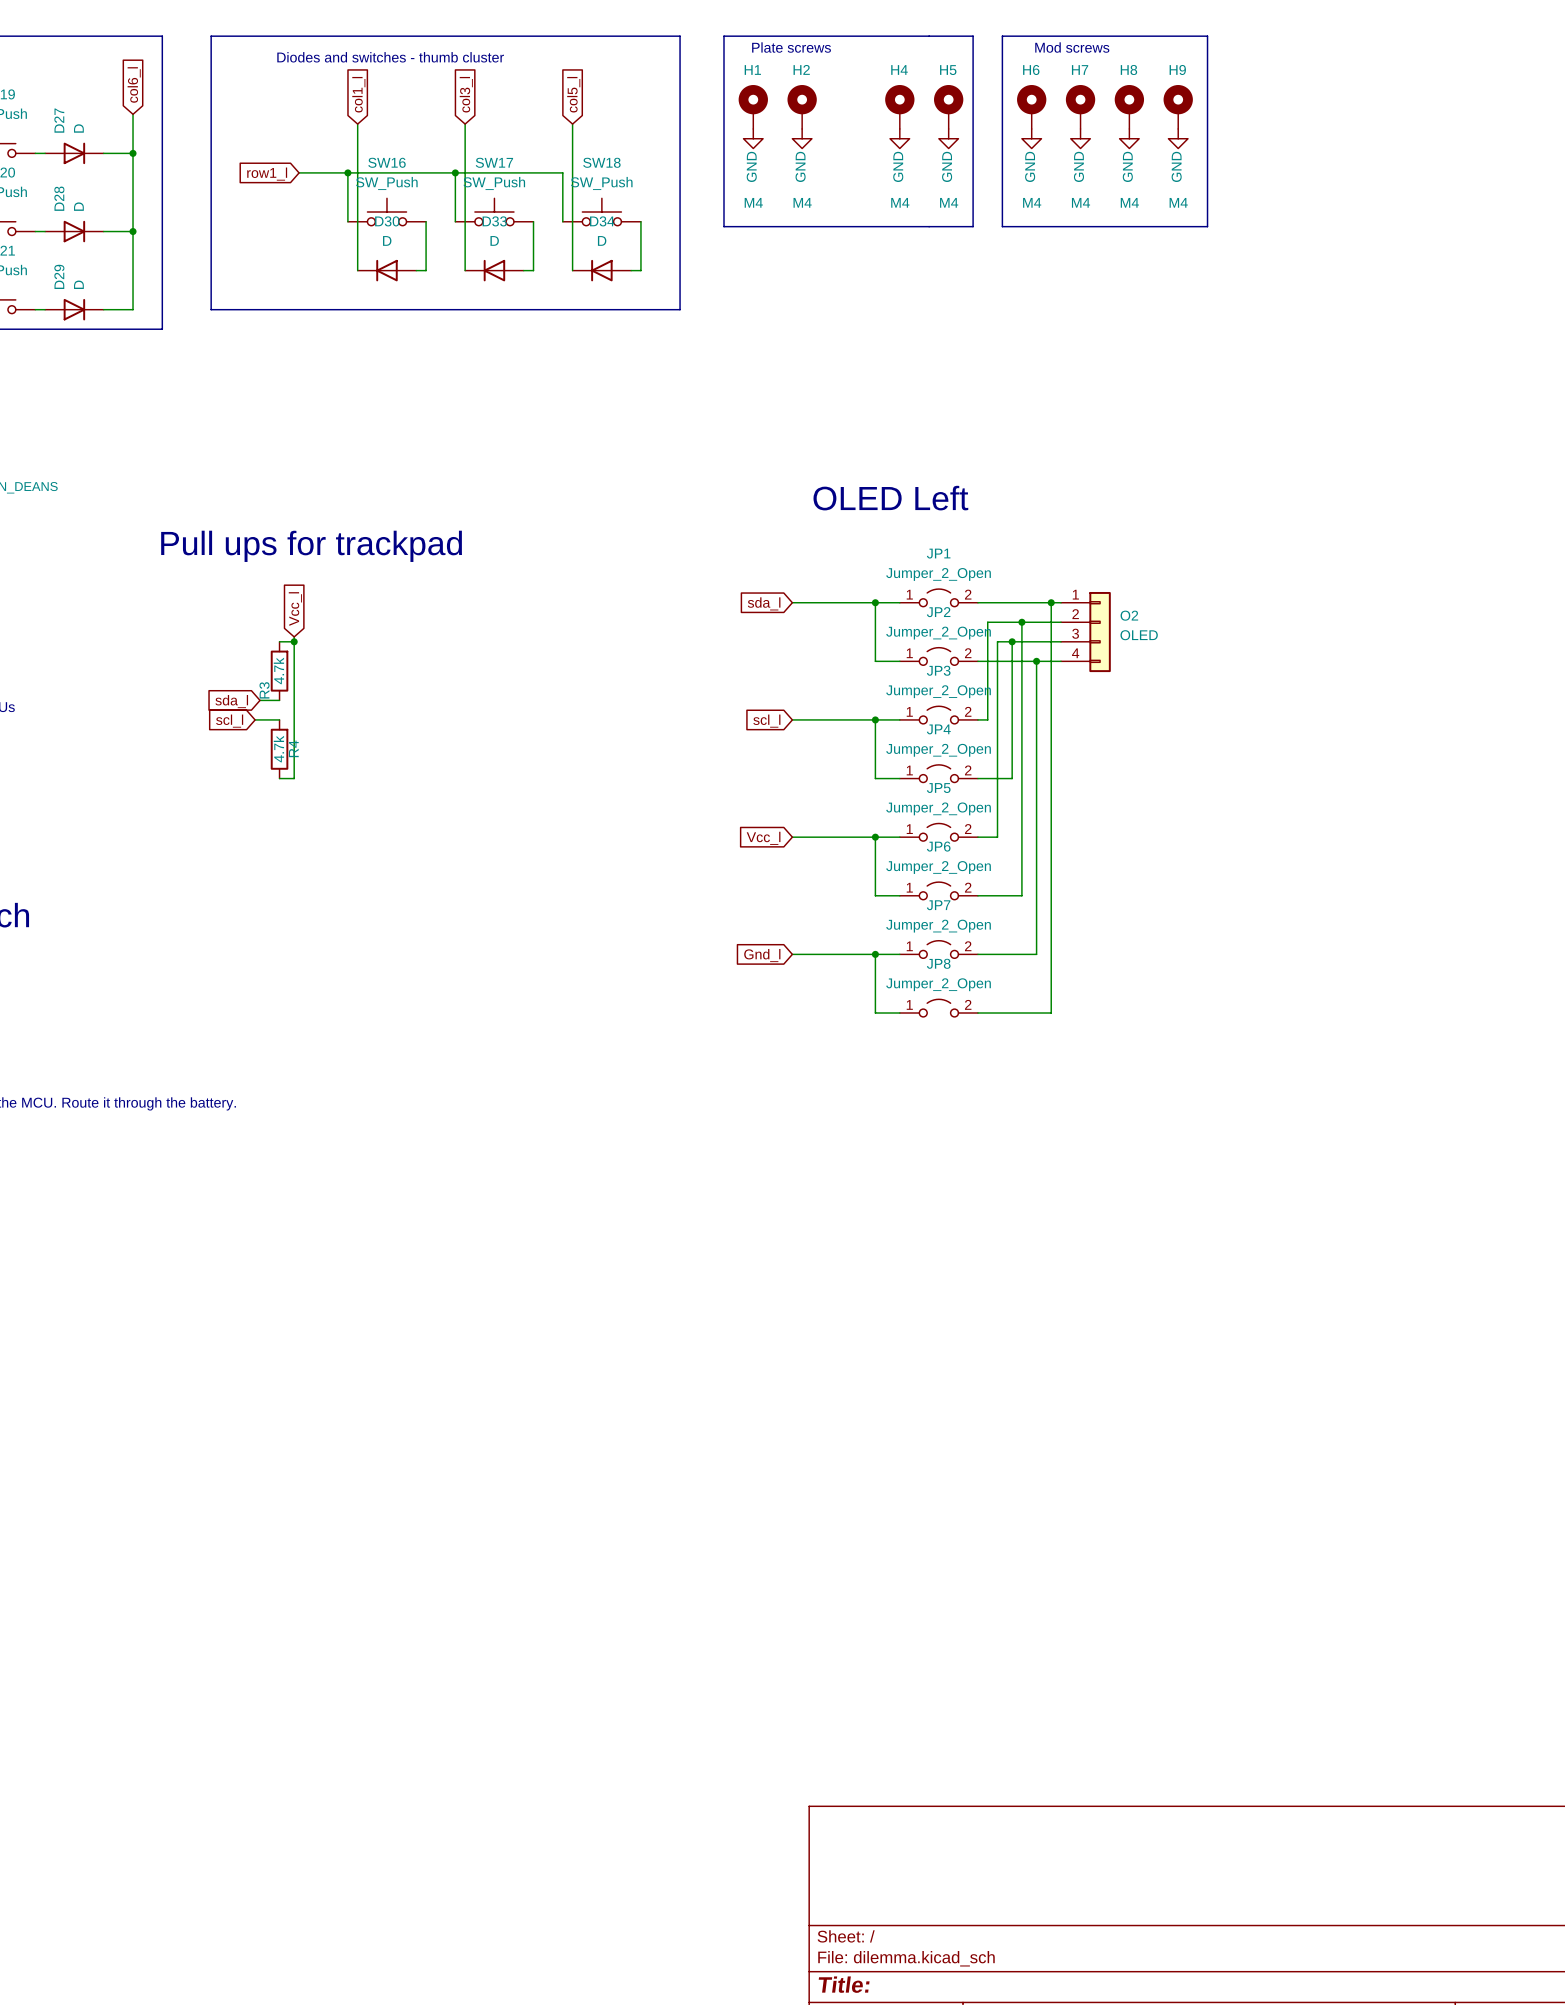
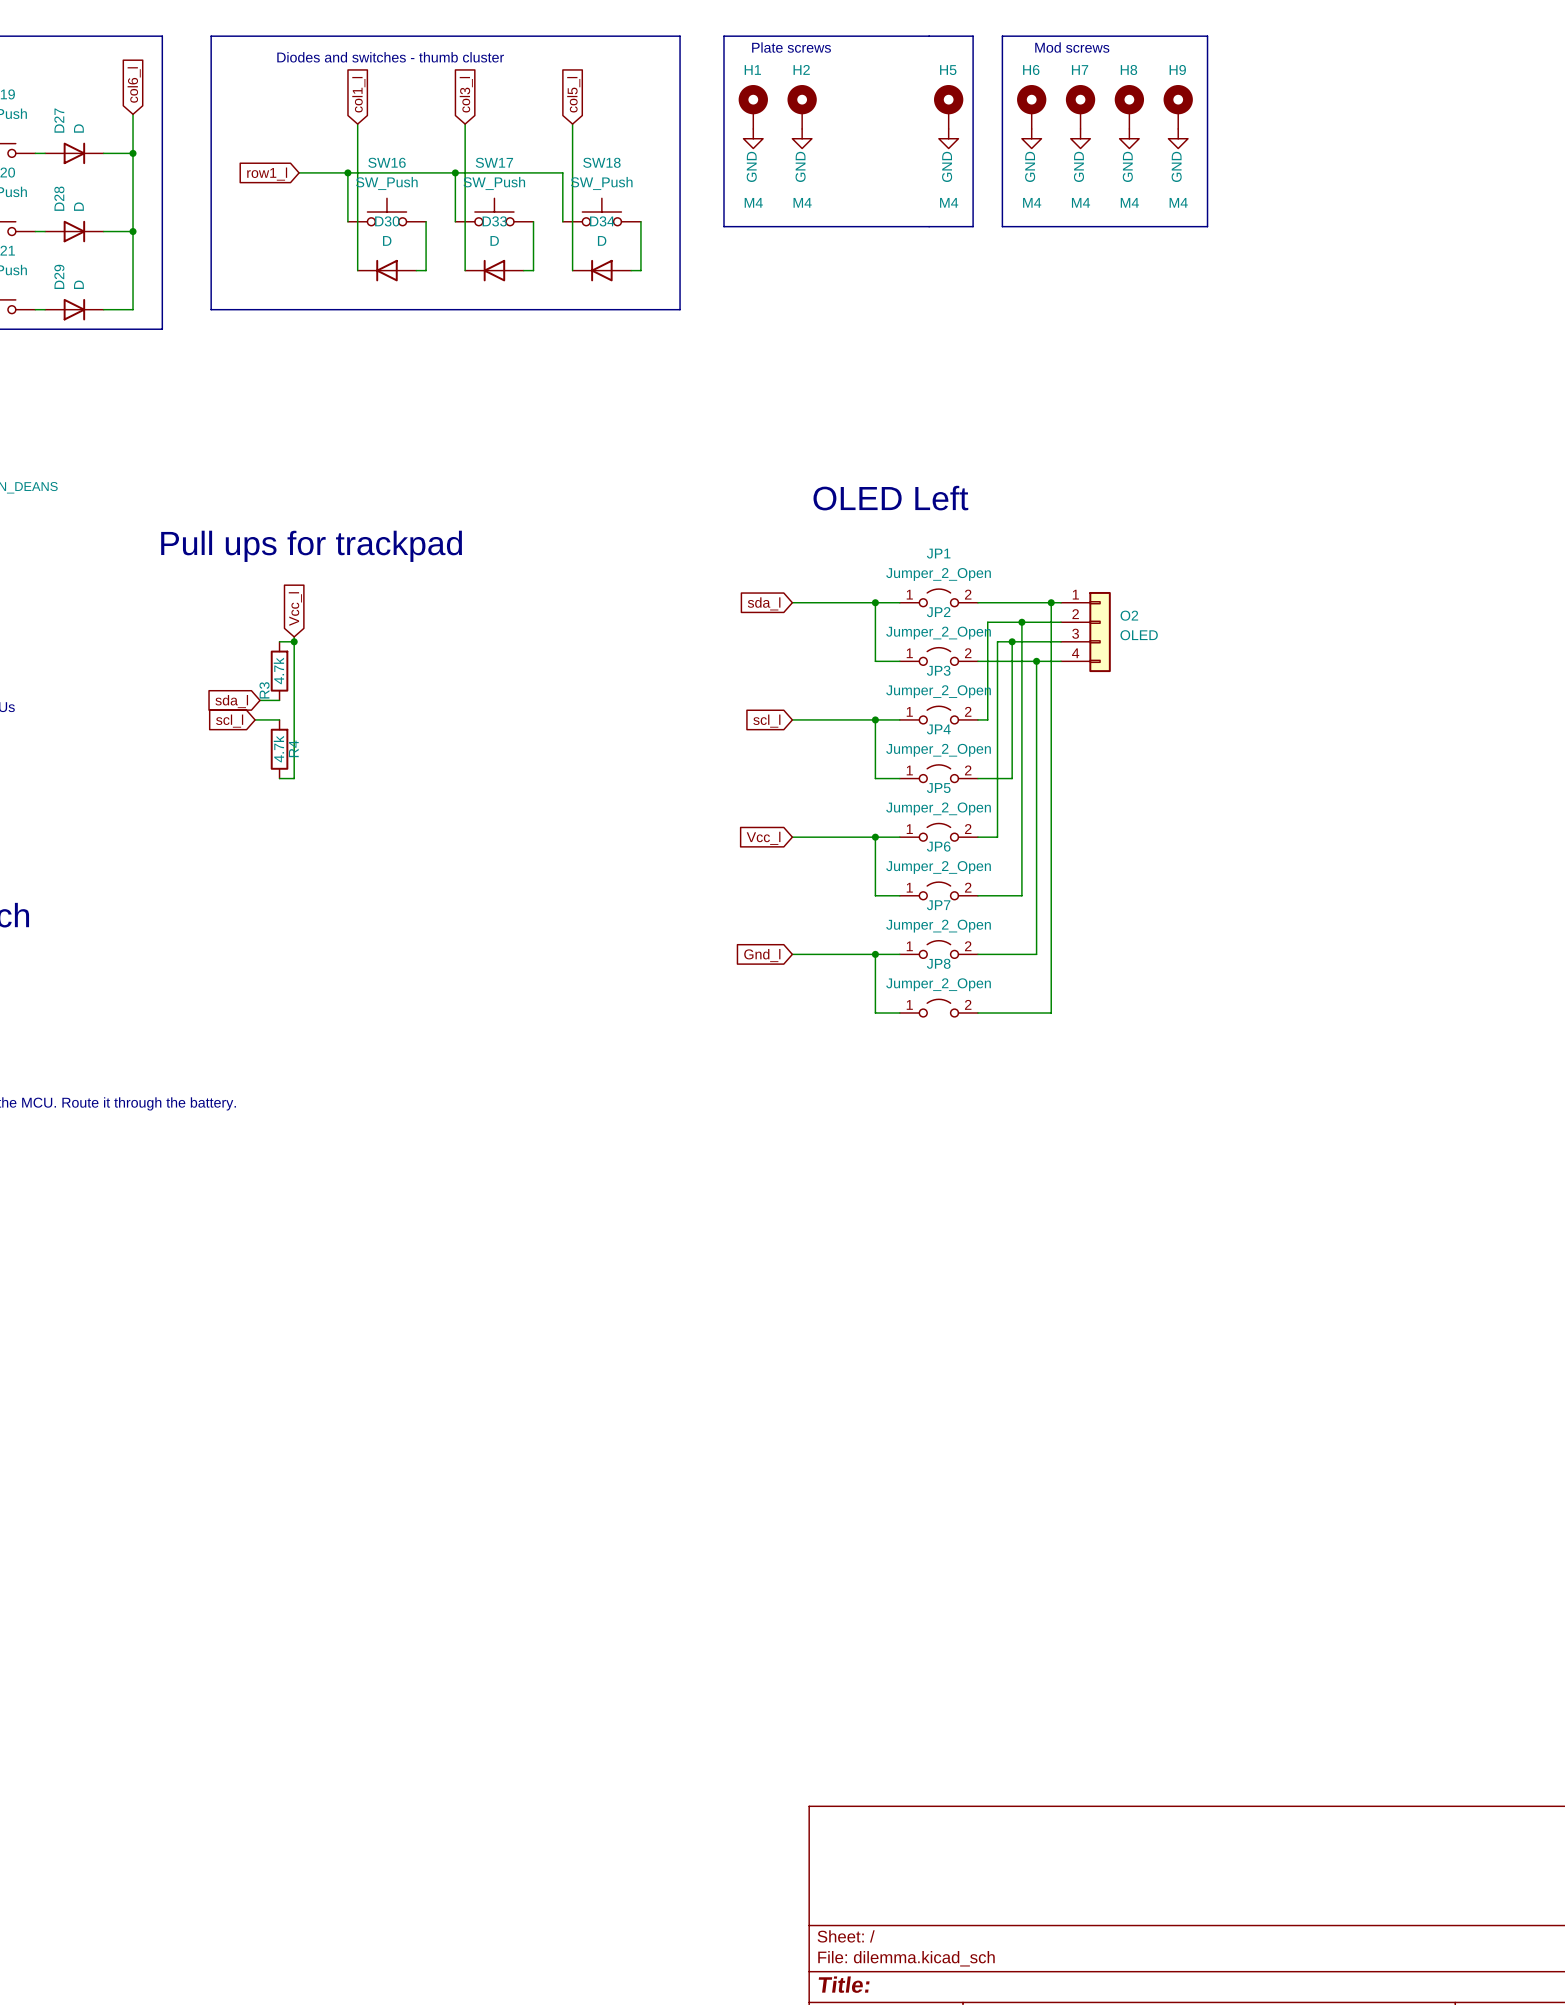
H4: M4 (899, 106) -> none
power symbol: GND (899, 138) -> none

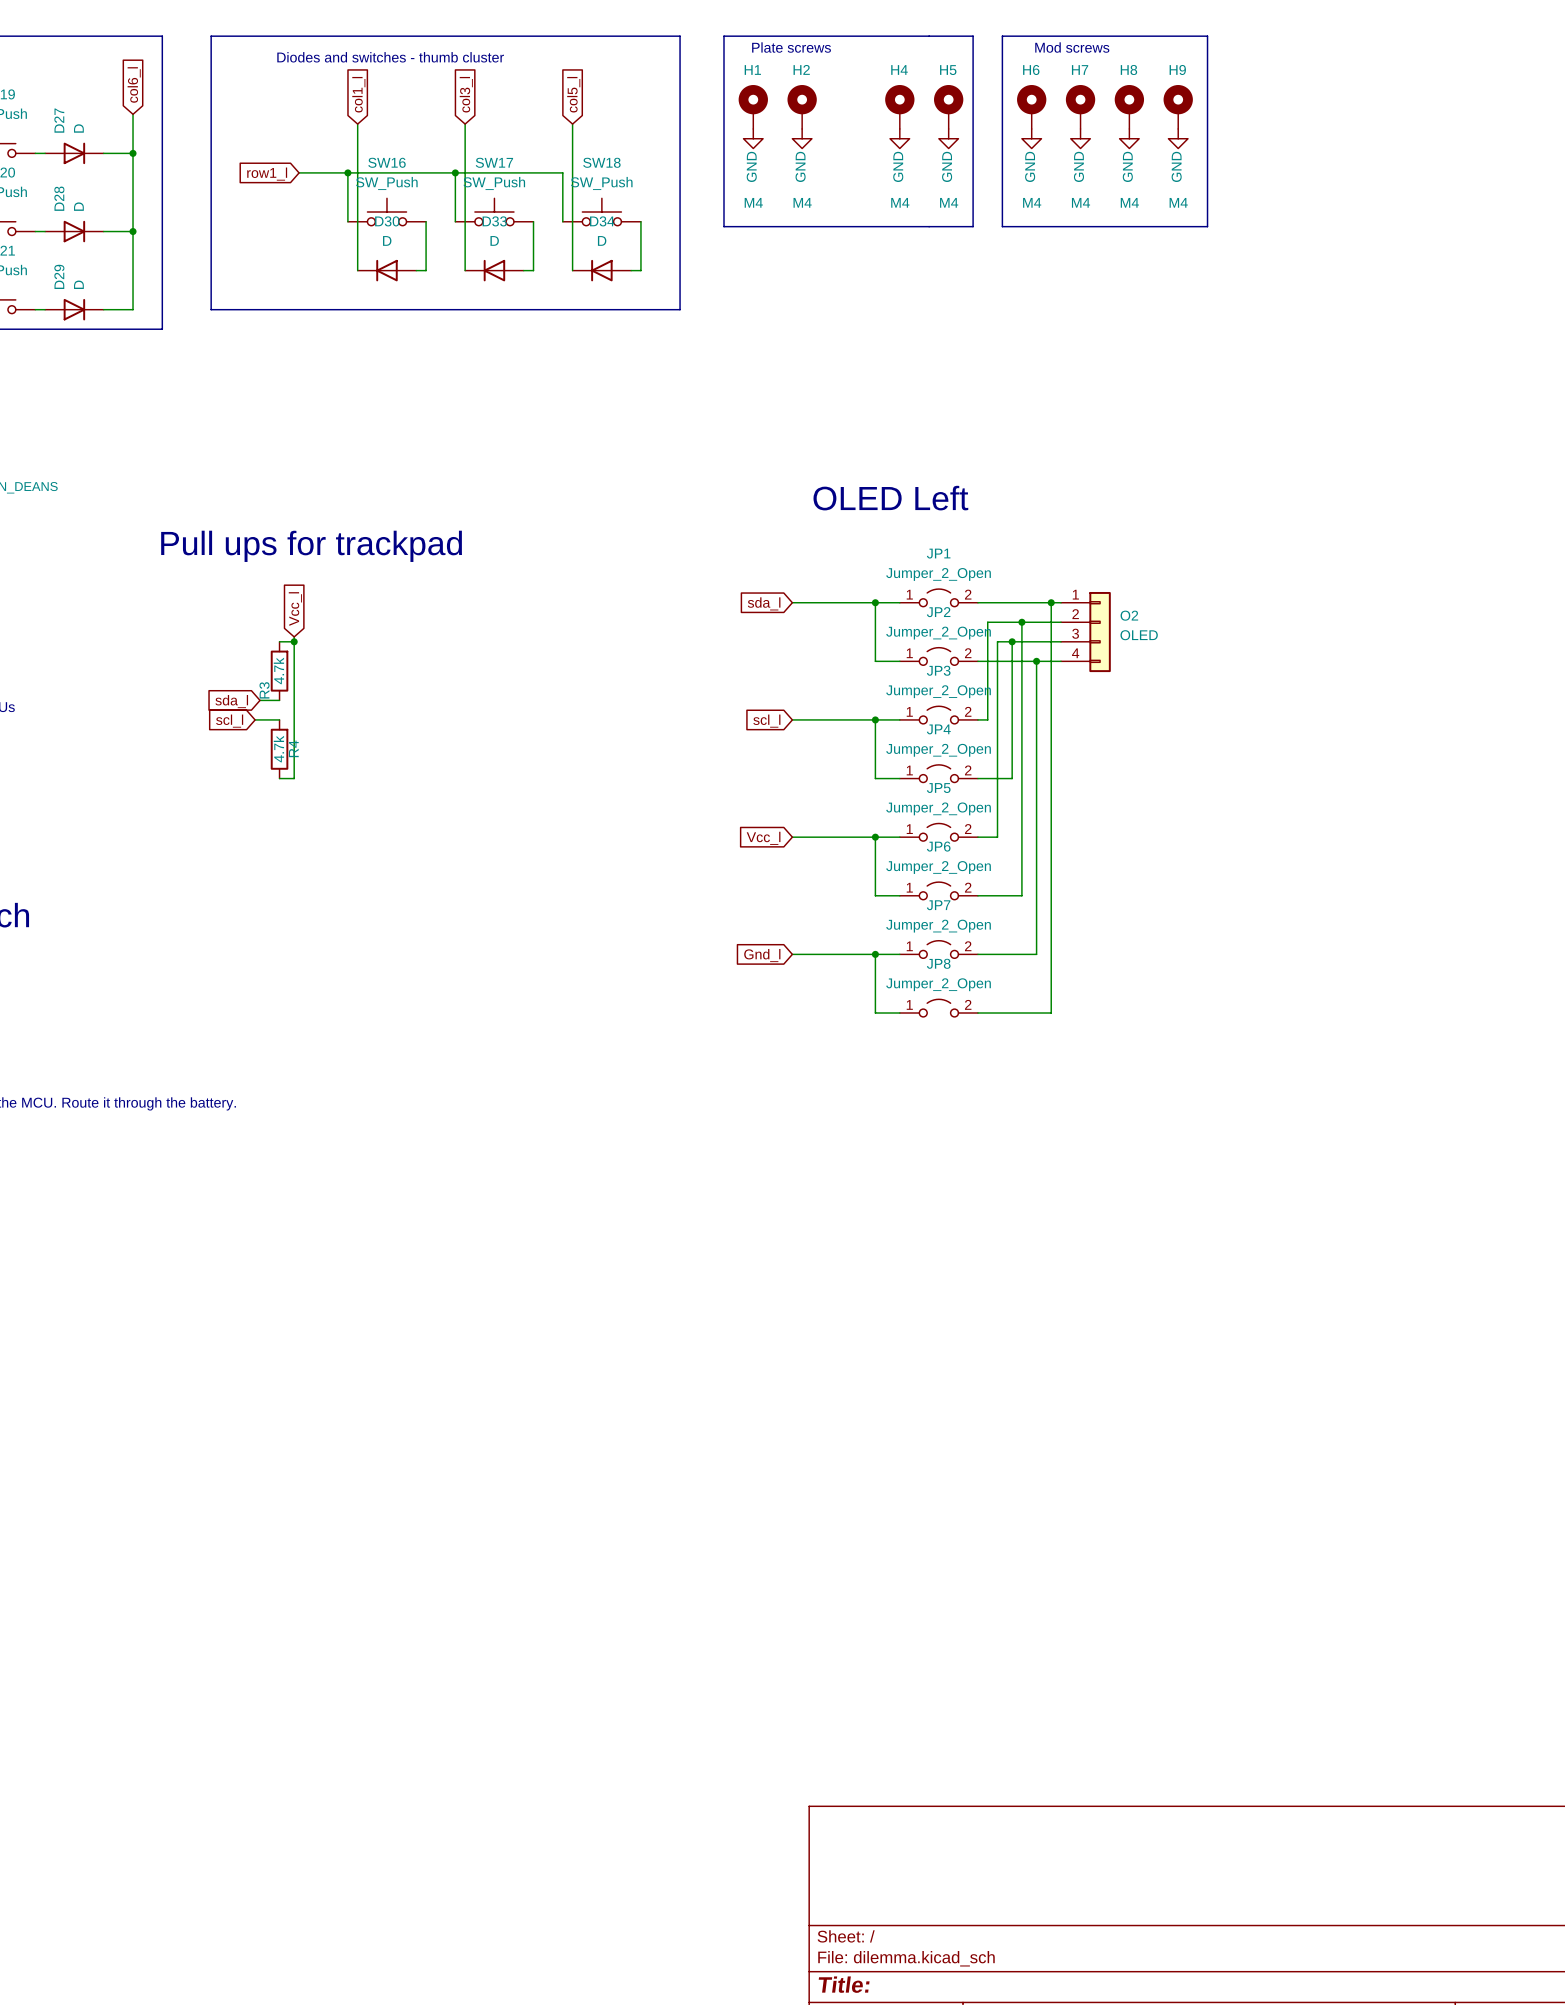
H4: none -> M4 (899, 106)
power symbol: none -> GND (899, 138)

